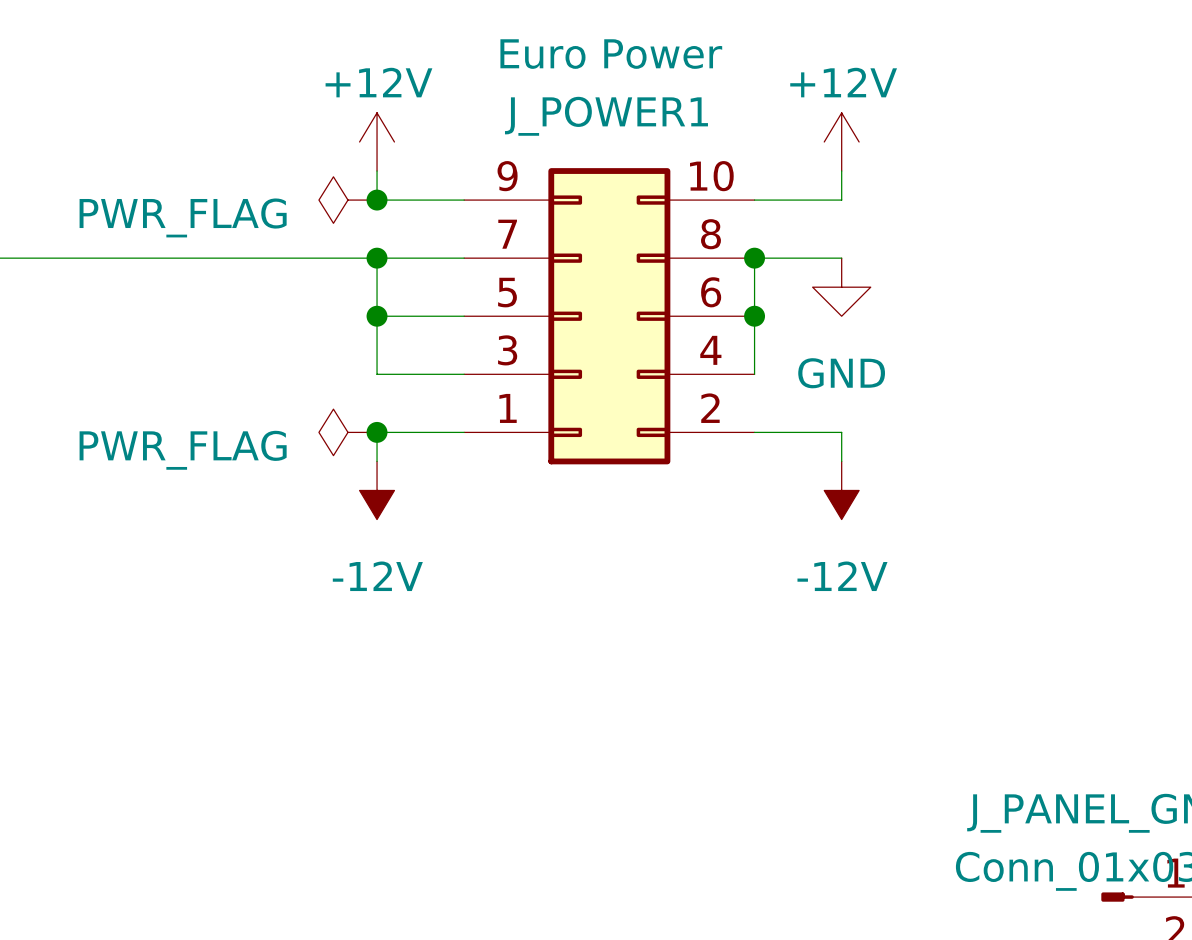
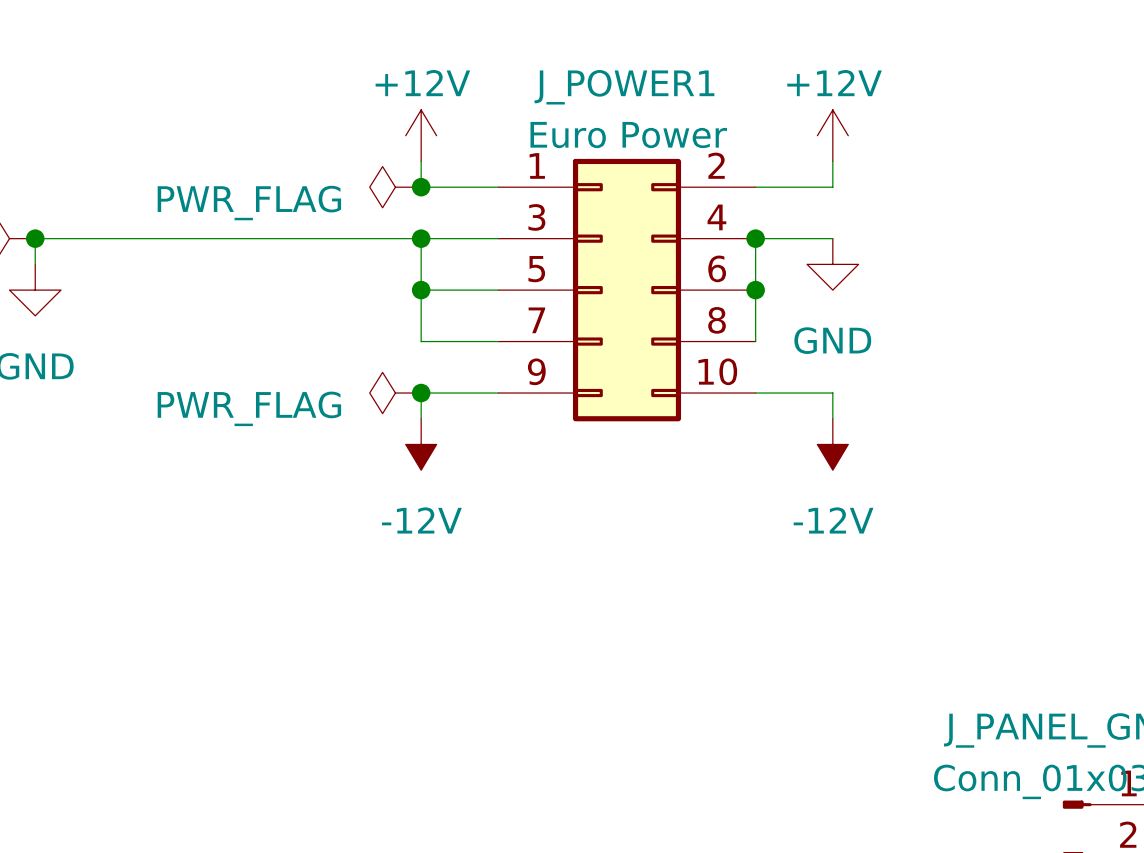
J_POWER1 value position: Euro Power (611, 54) -> Euro Power (628, 135)
J_POWER1 flip: as is (609, 316) -> up-down (627, 290)

